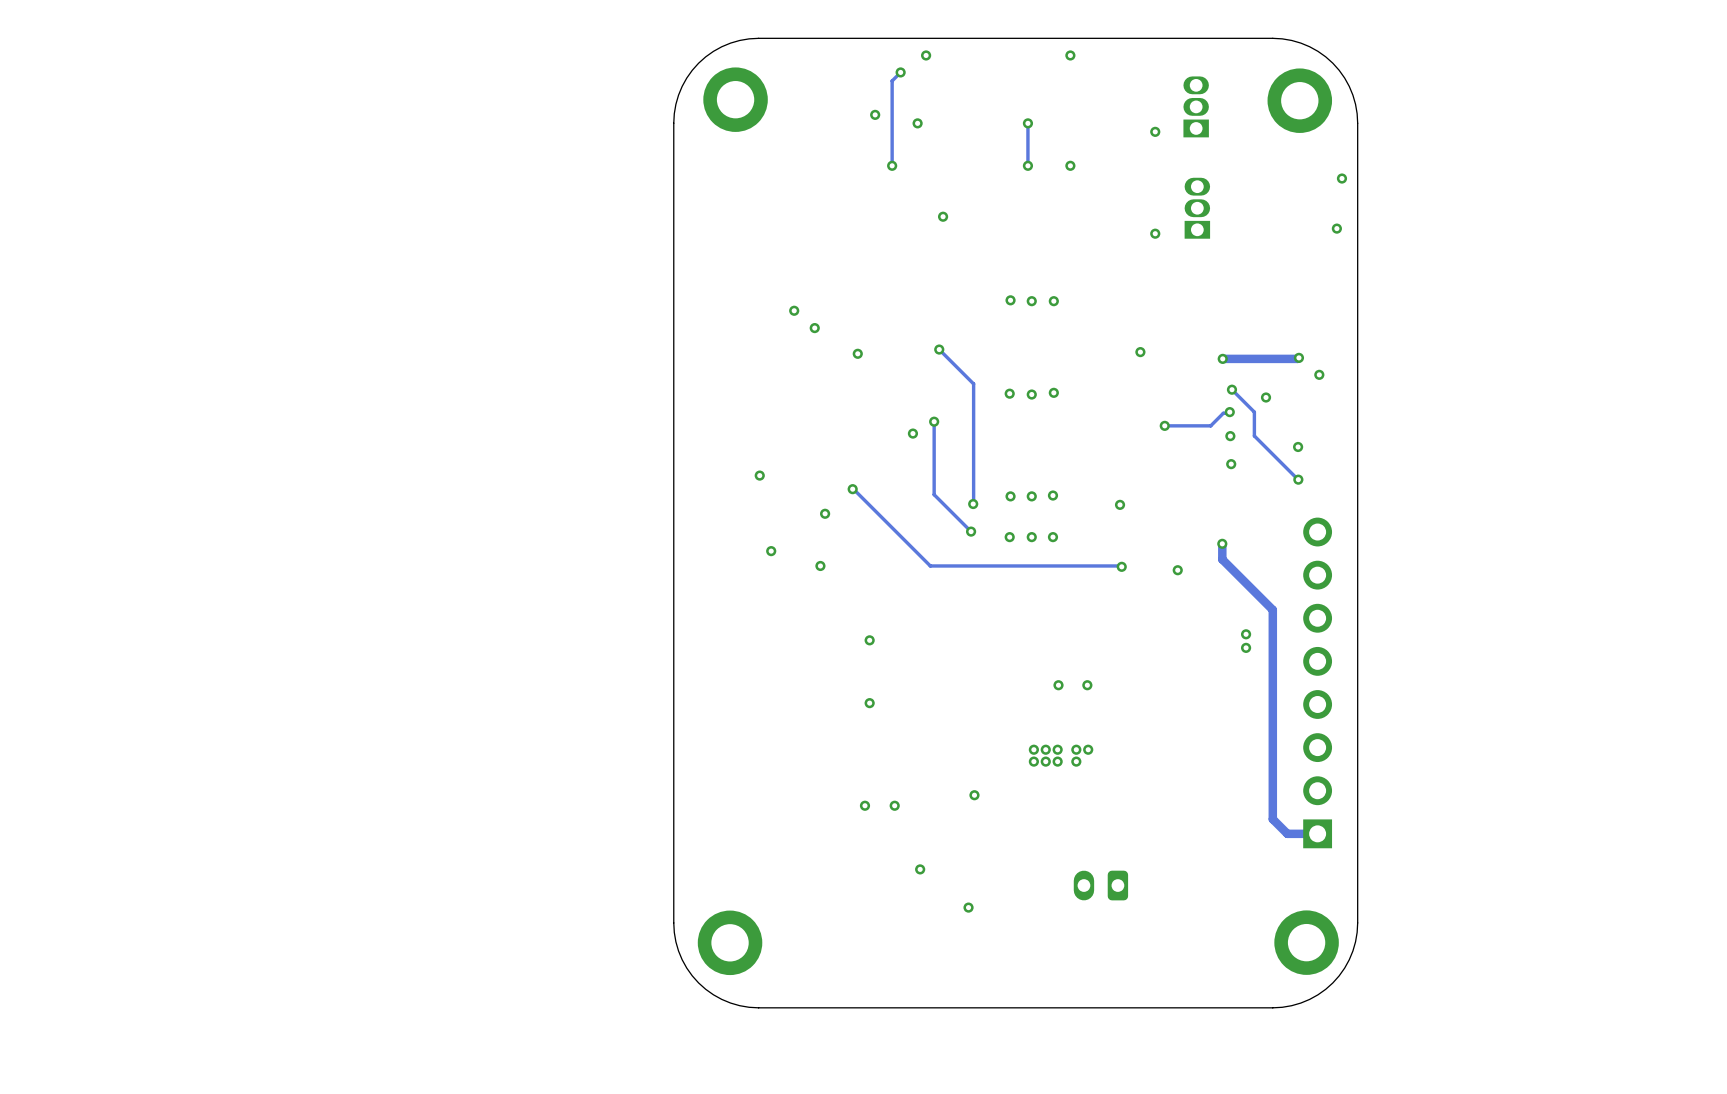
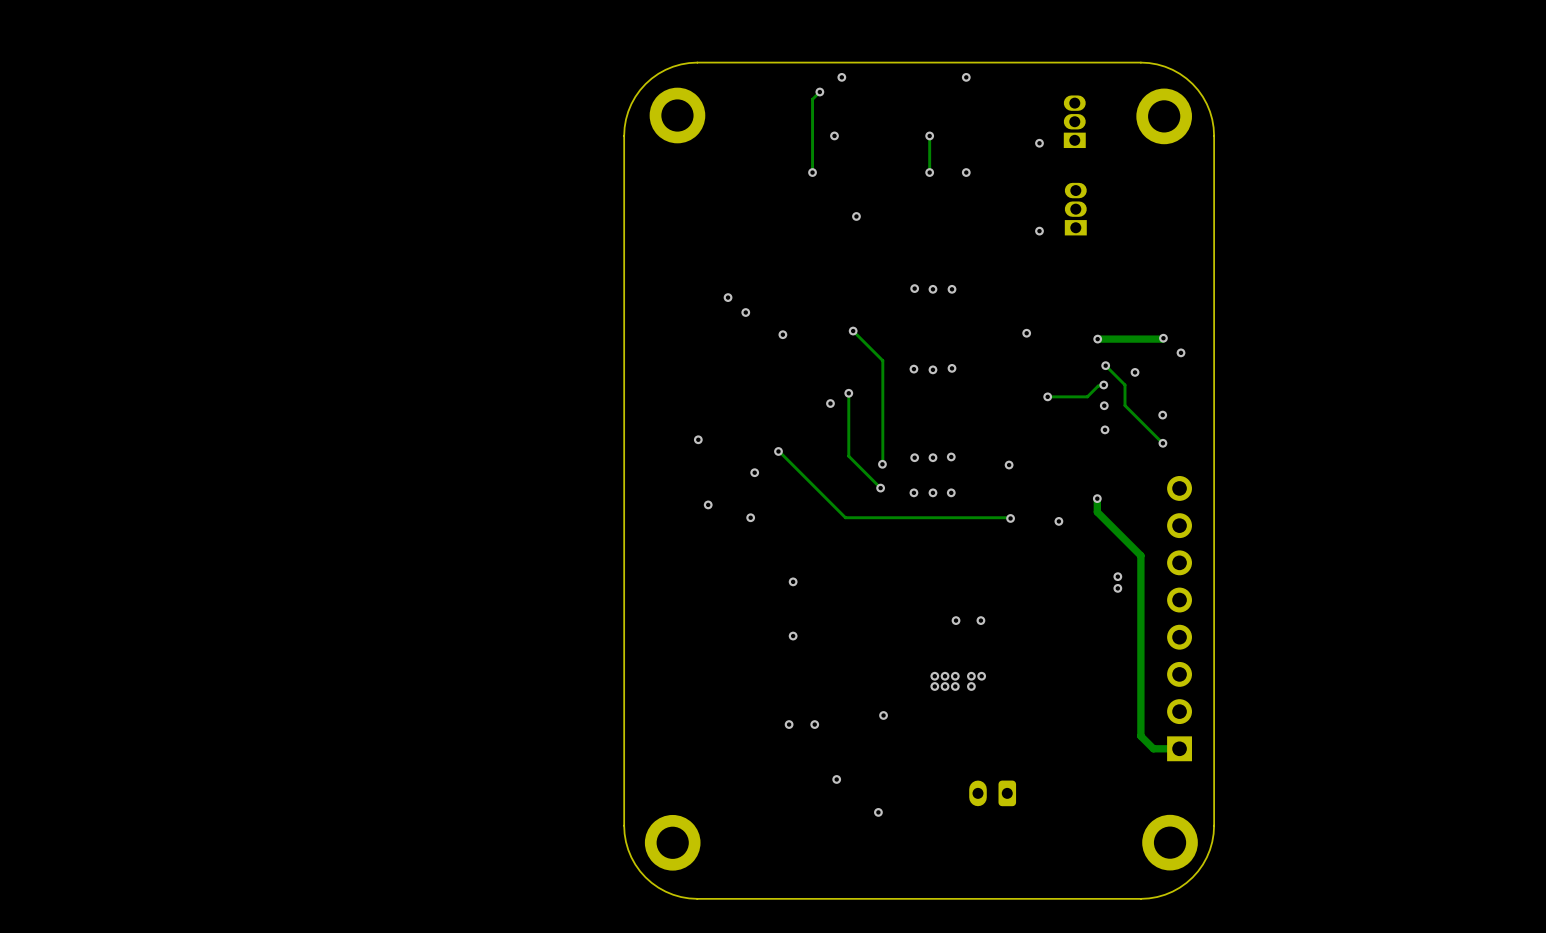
via: (875, 114) -> none
via: (1341, 178) -> none
via: (1336, 228) -> none

